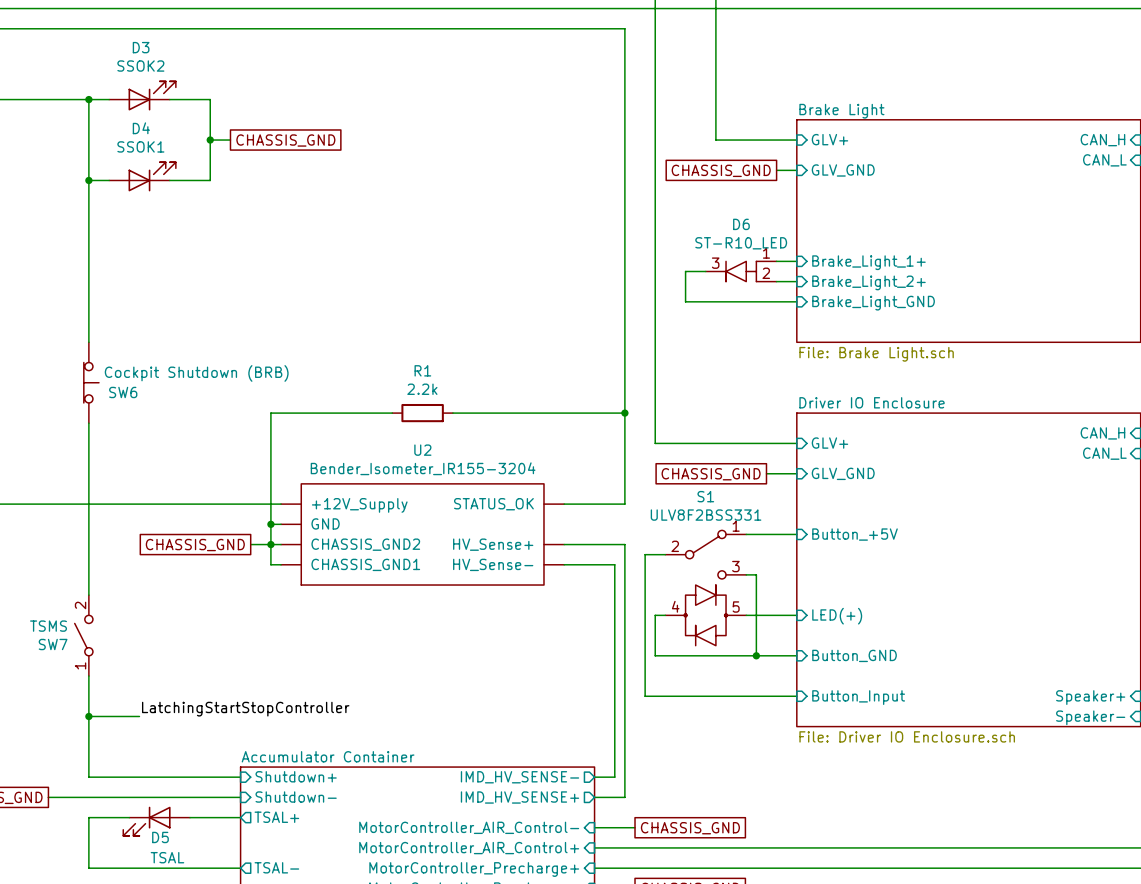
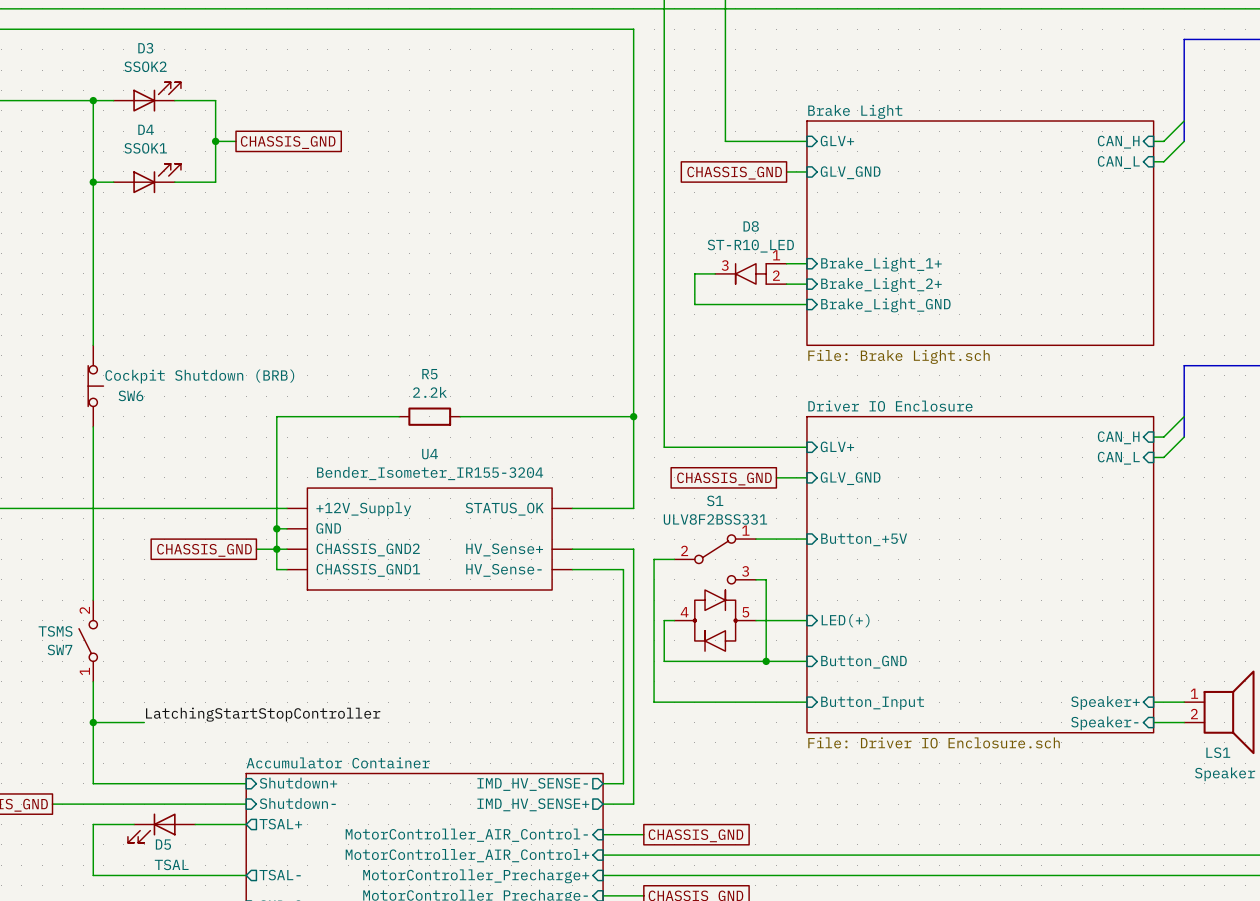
D6 name: D6 (741, 224) -> D8 (751, 226)
R1 name: R1 (422, 370) -> R5 (429, 374)
U2 name: U2 (422, 450) -> U4 (430, 454)

